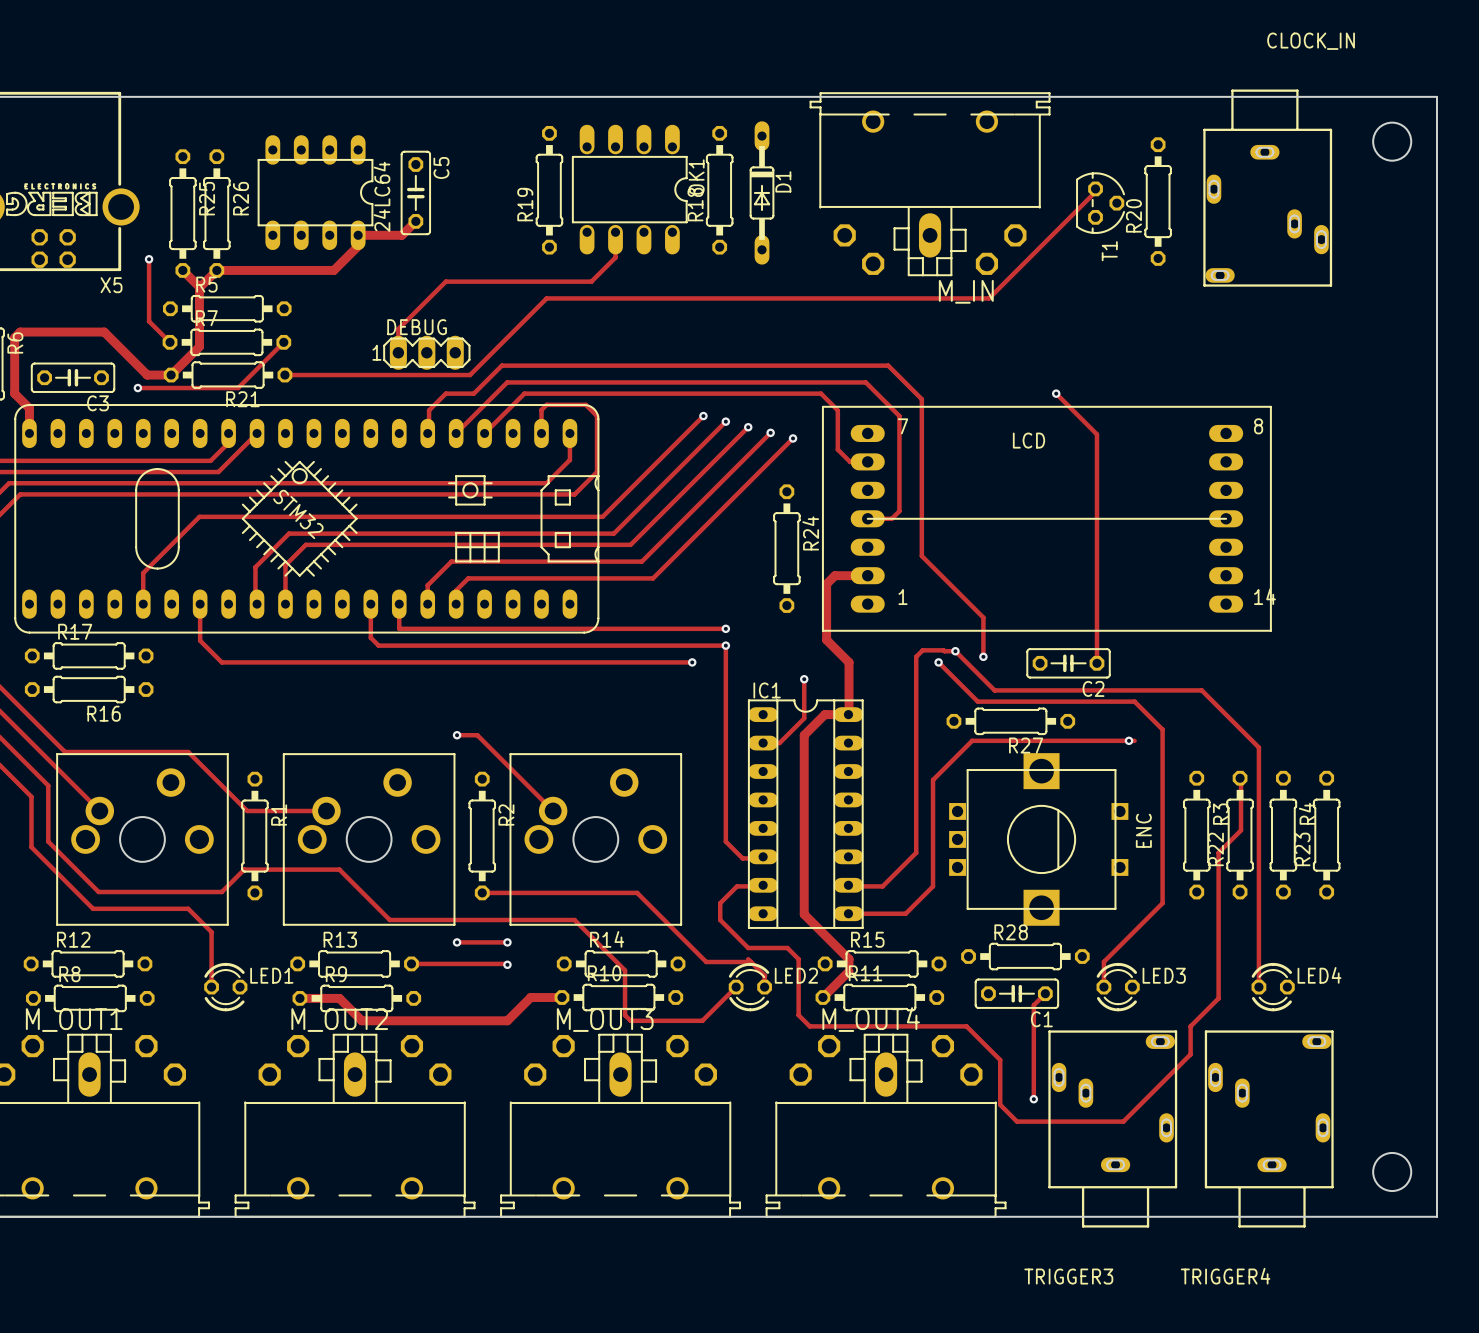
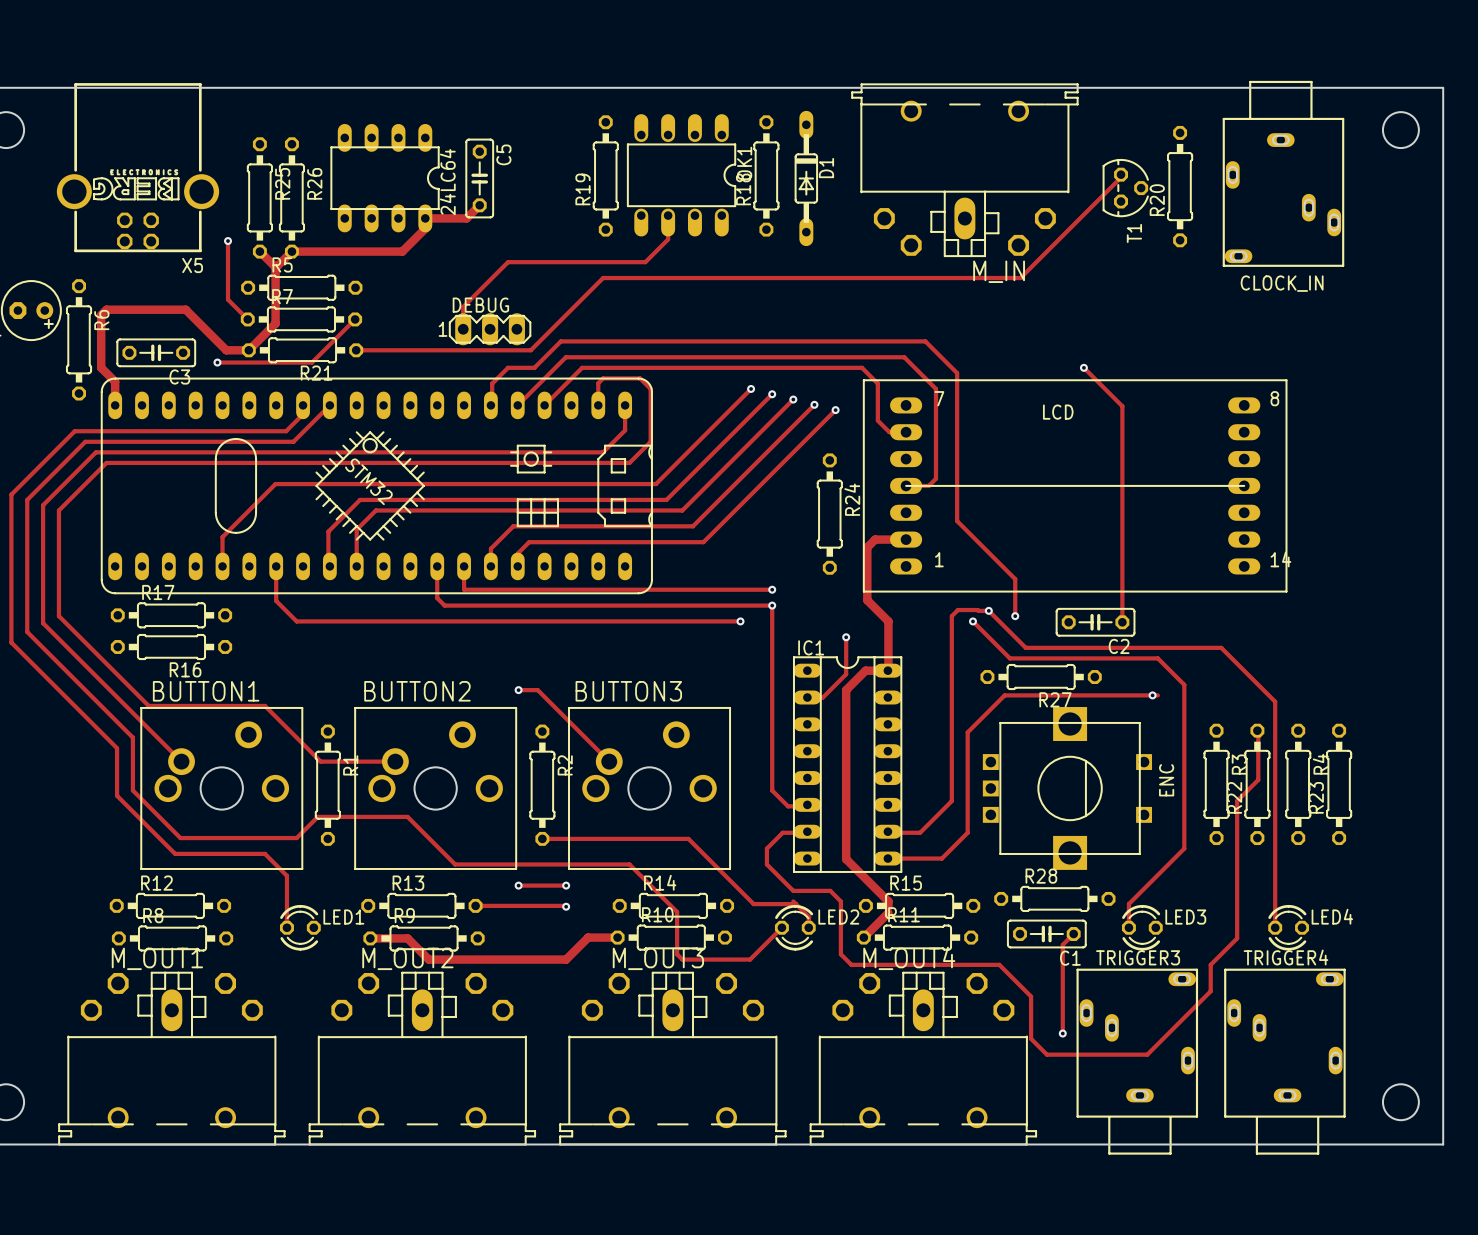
CLOCK_IN name position: CLOCK_IN (1311, 41) -> CLOCK_IN (1282, 283)
text: none -> BUTTON1 (206, 691)
text: none -> BUTTON2 (417, 691)
text: none -> BUTTON3 (628, 691)
TRIGGER3 name position: TRIGGER3 (1068, 1276) -> TRIGGER3 (1138, 957)
TRIGGER4 name position: TRIGGER4 (1225, 1276) -> TRIGGER4 (1285, 957)

